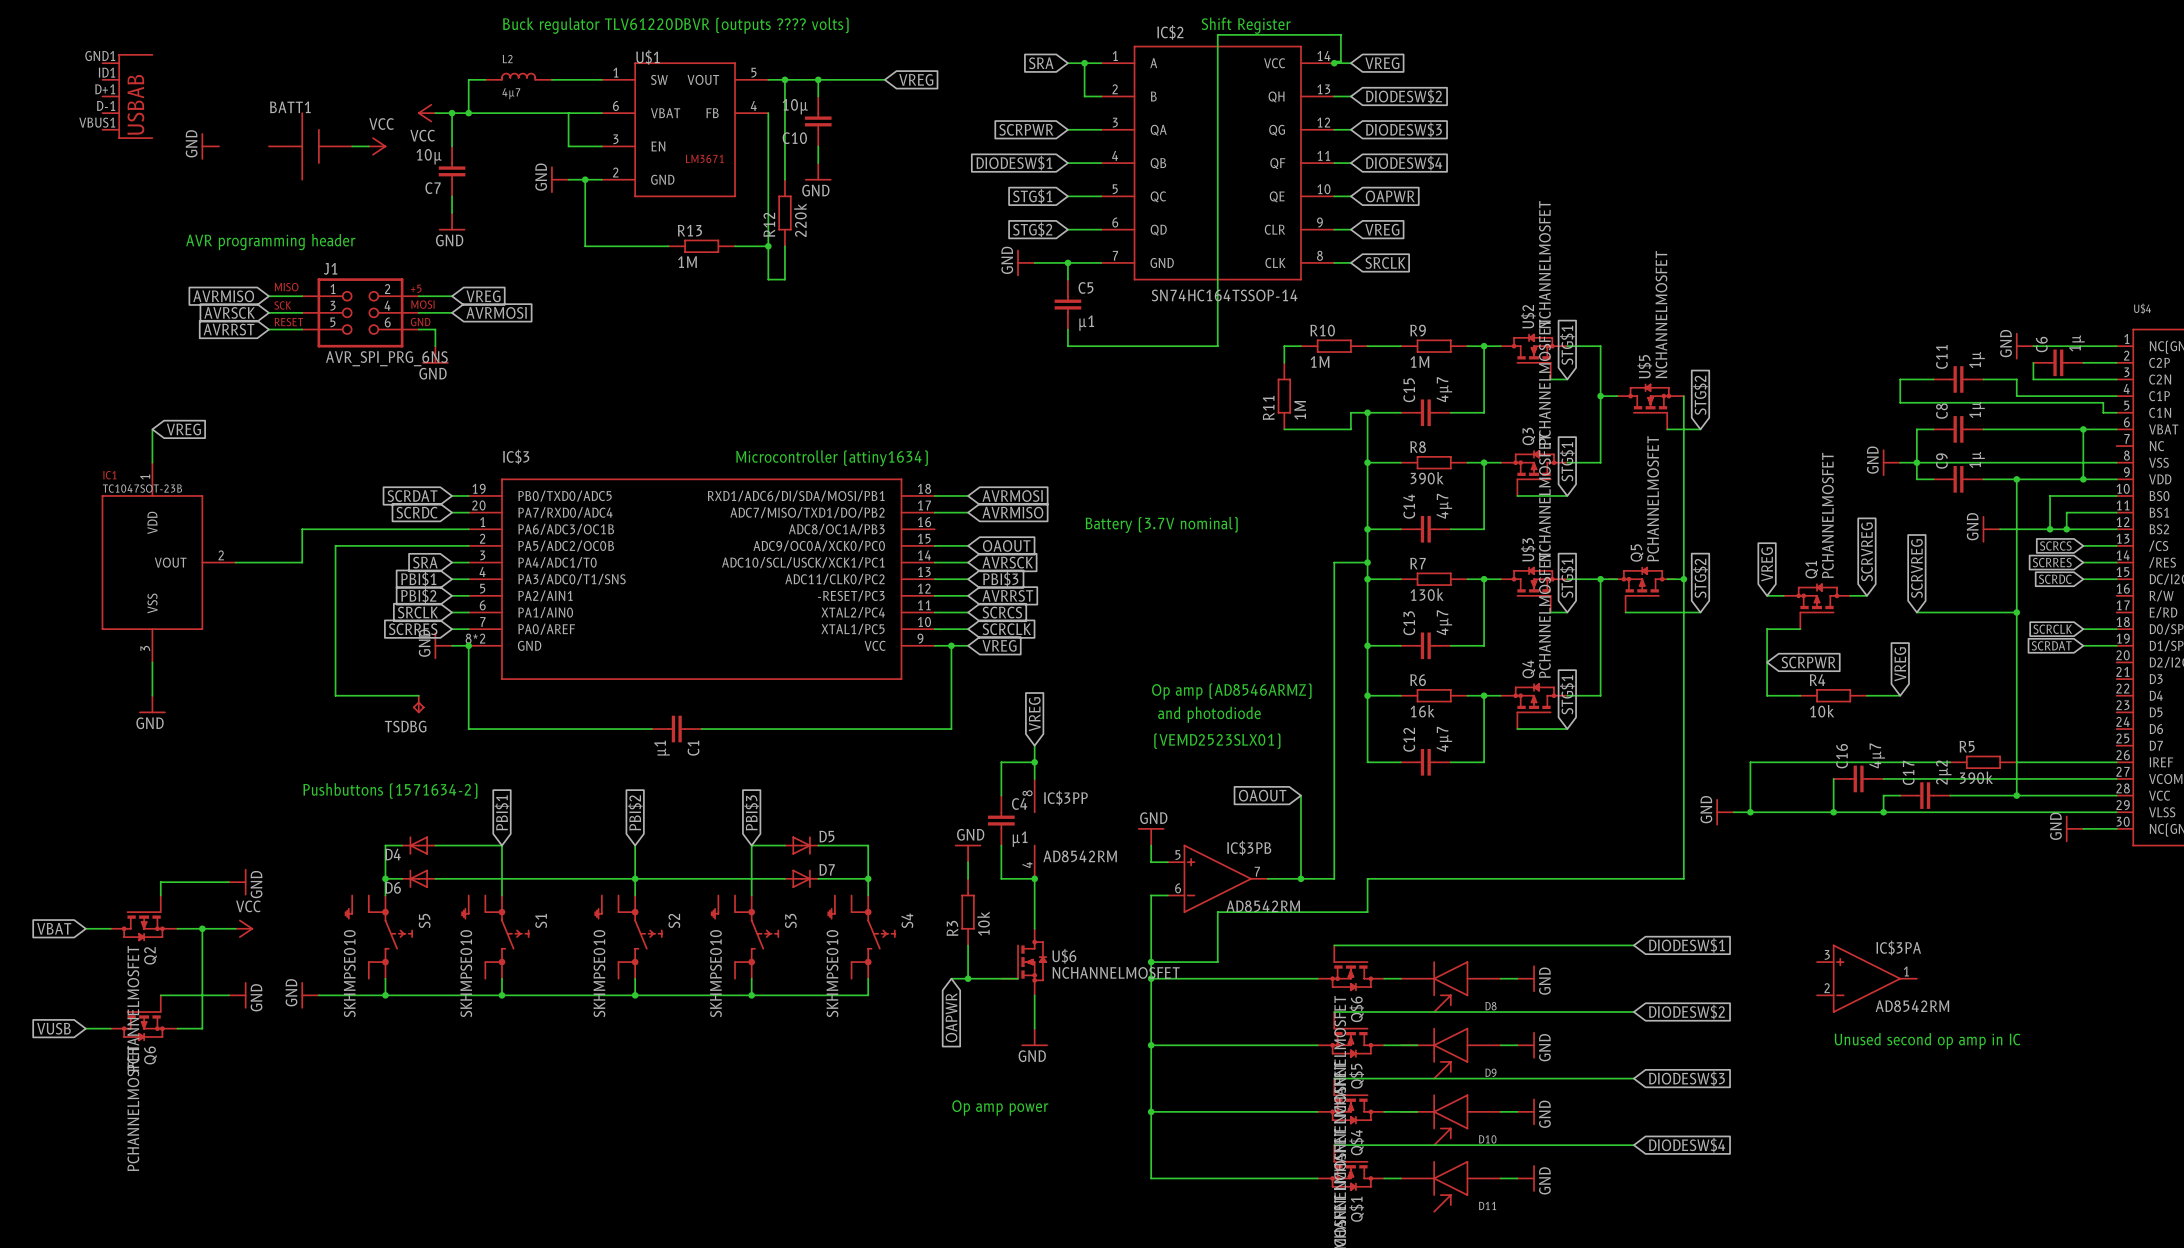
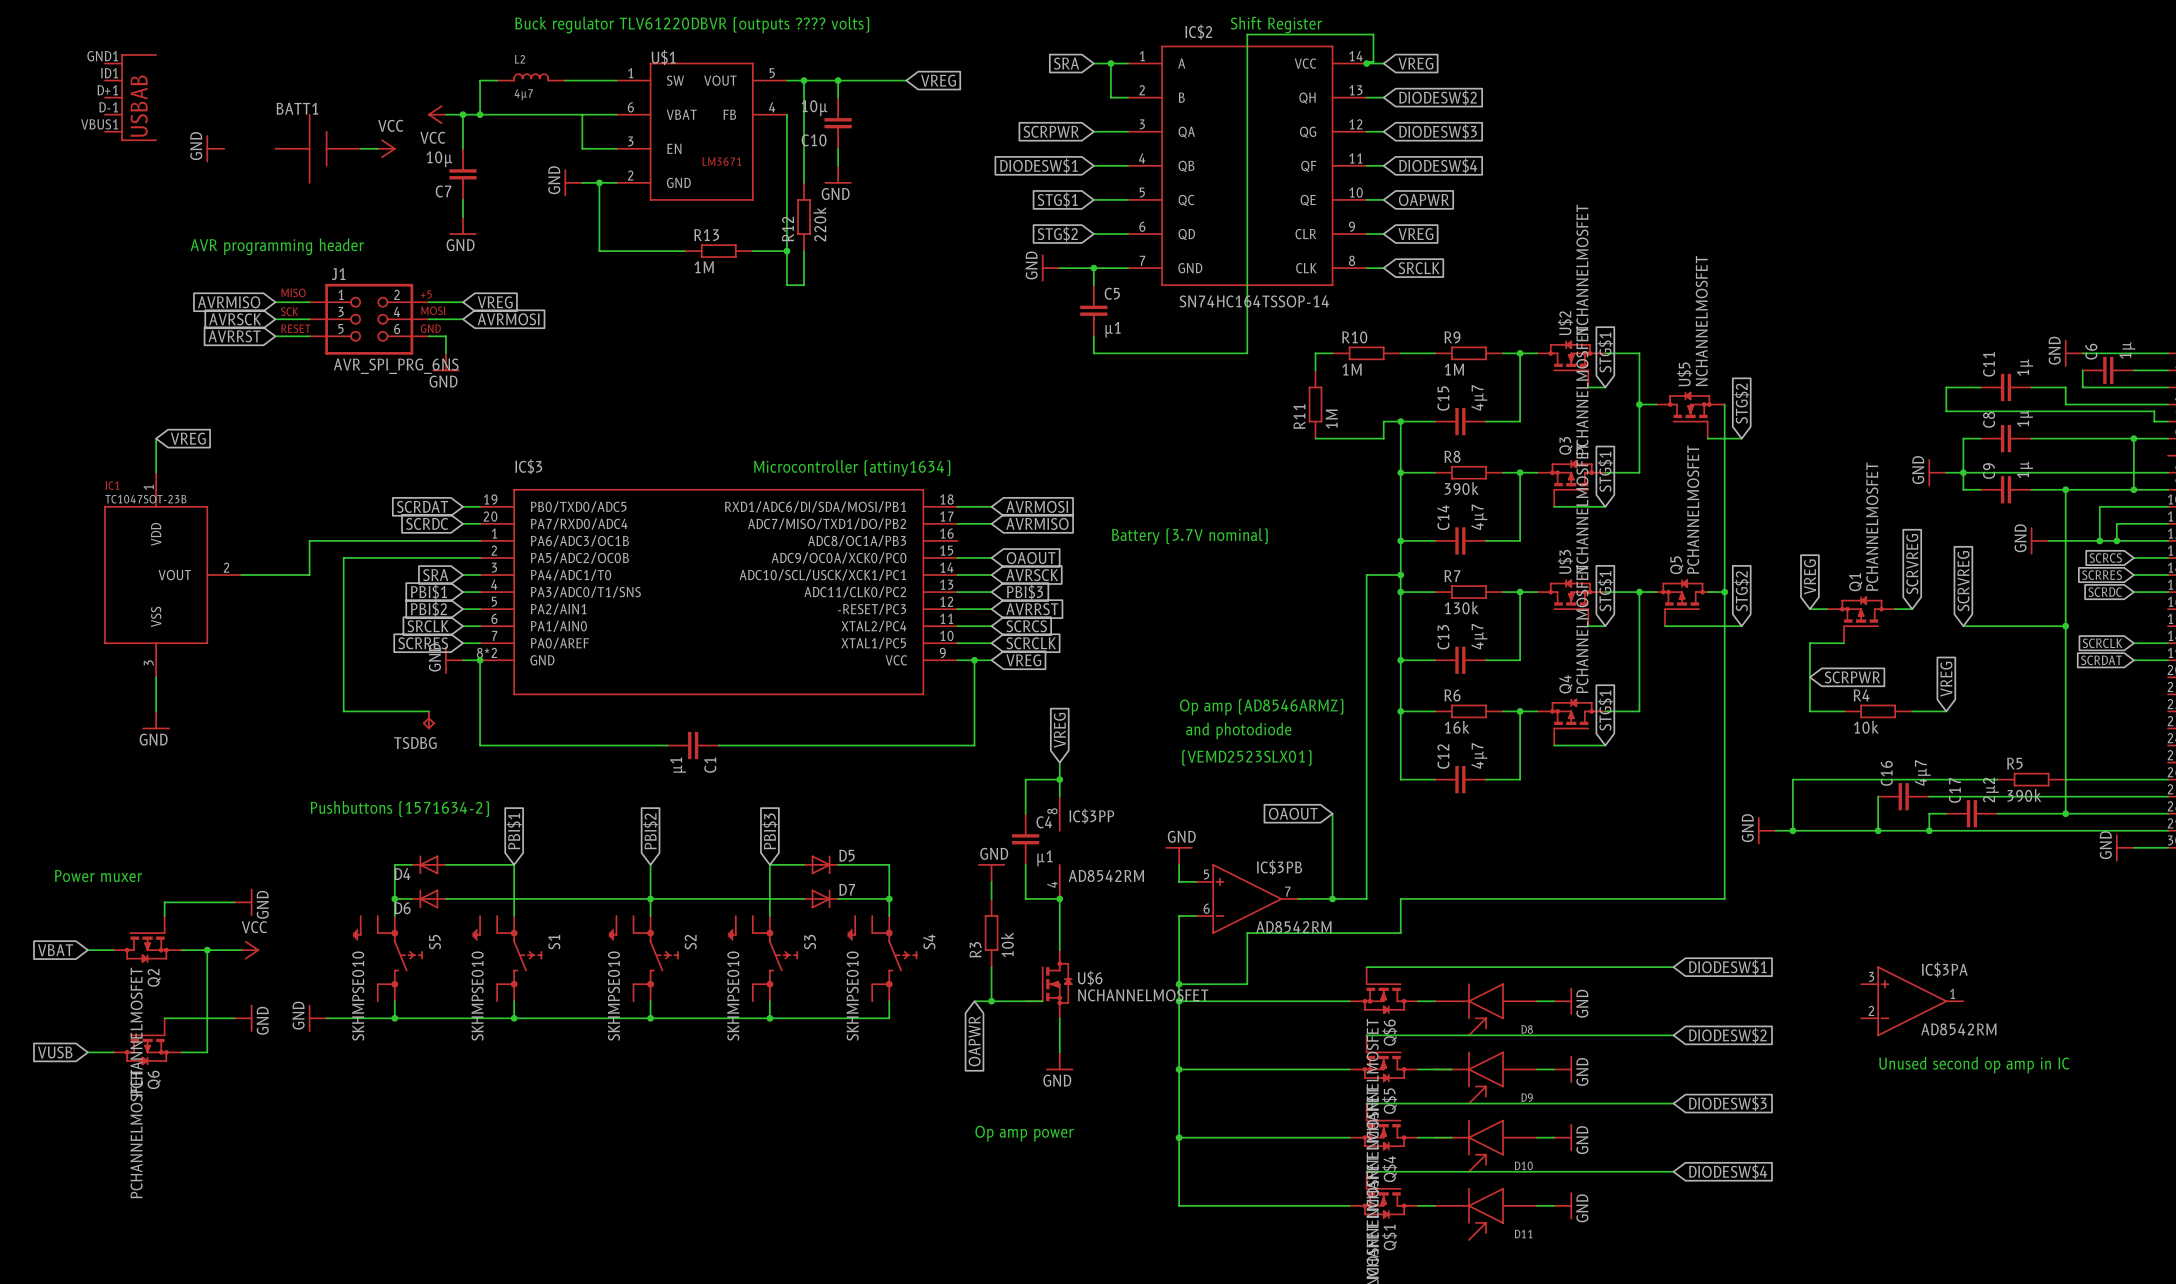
text: none -> Power muxer (98, 876)

